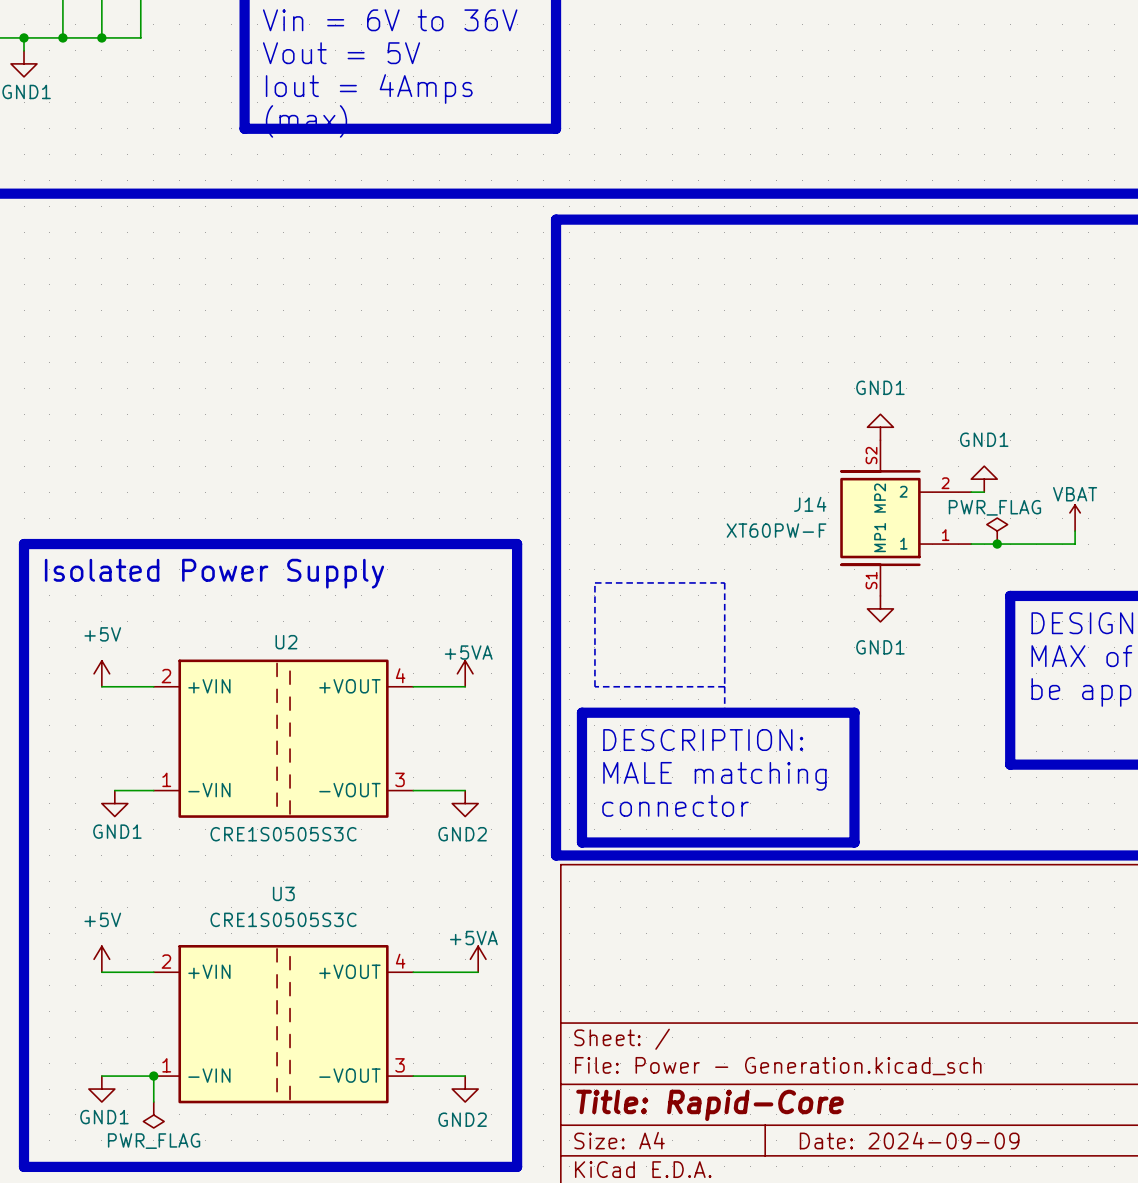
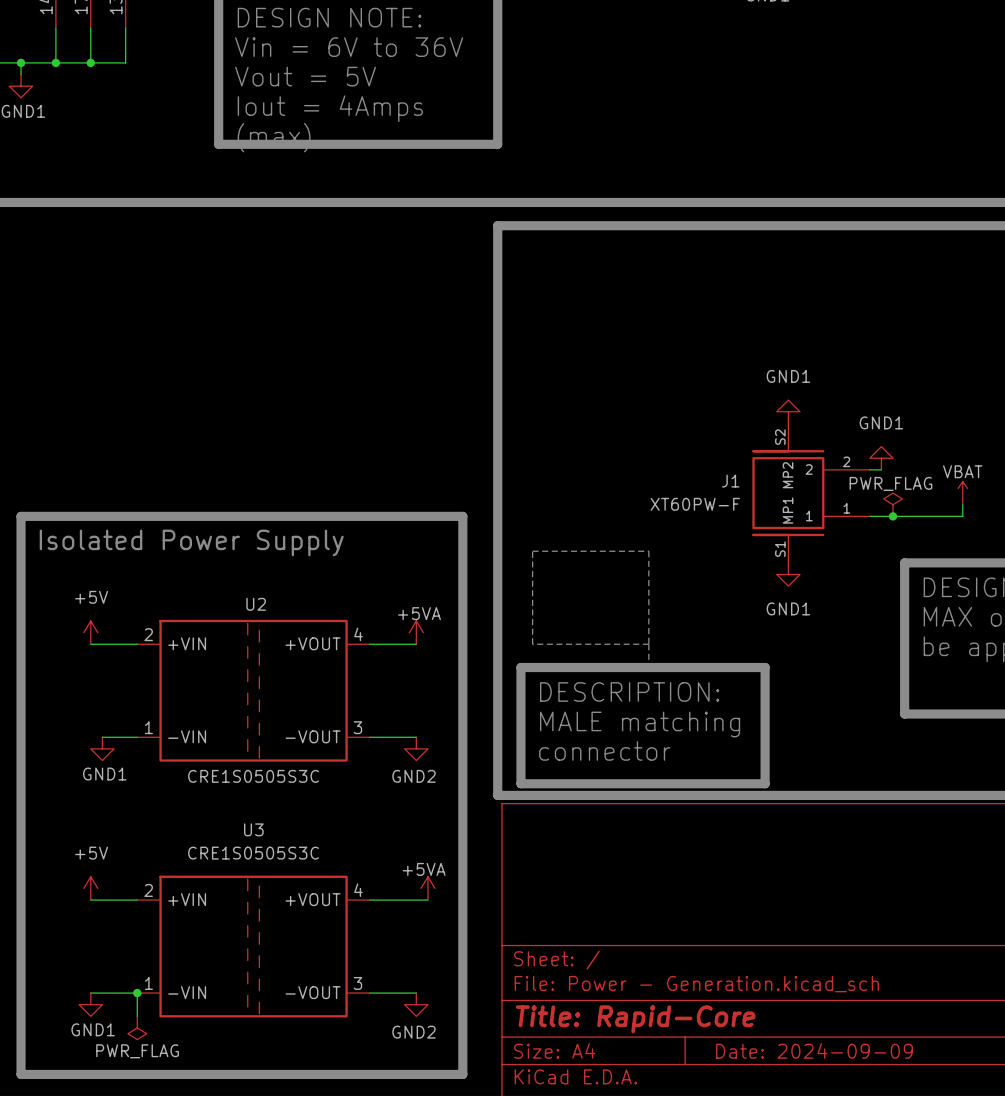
J14 name: J14 (810, 504) -> J1 (730, 481)

